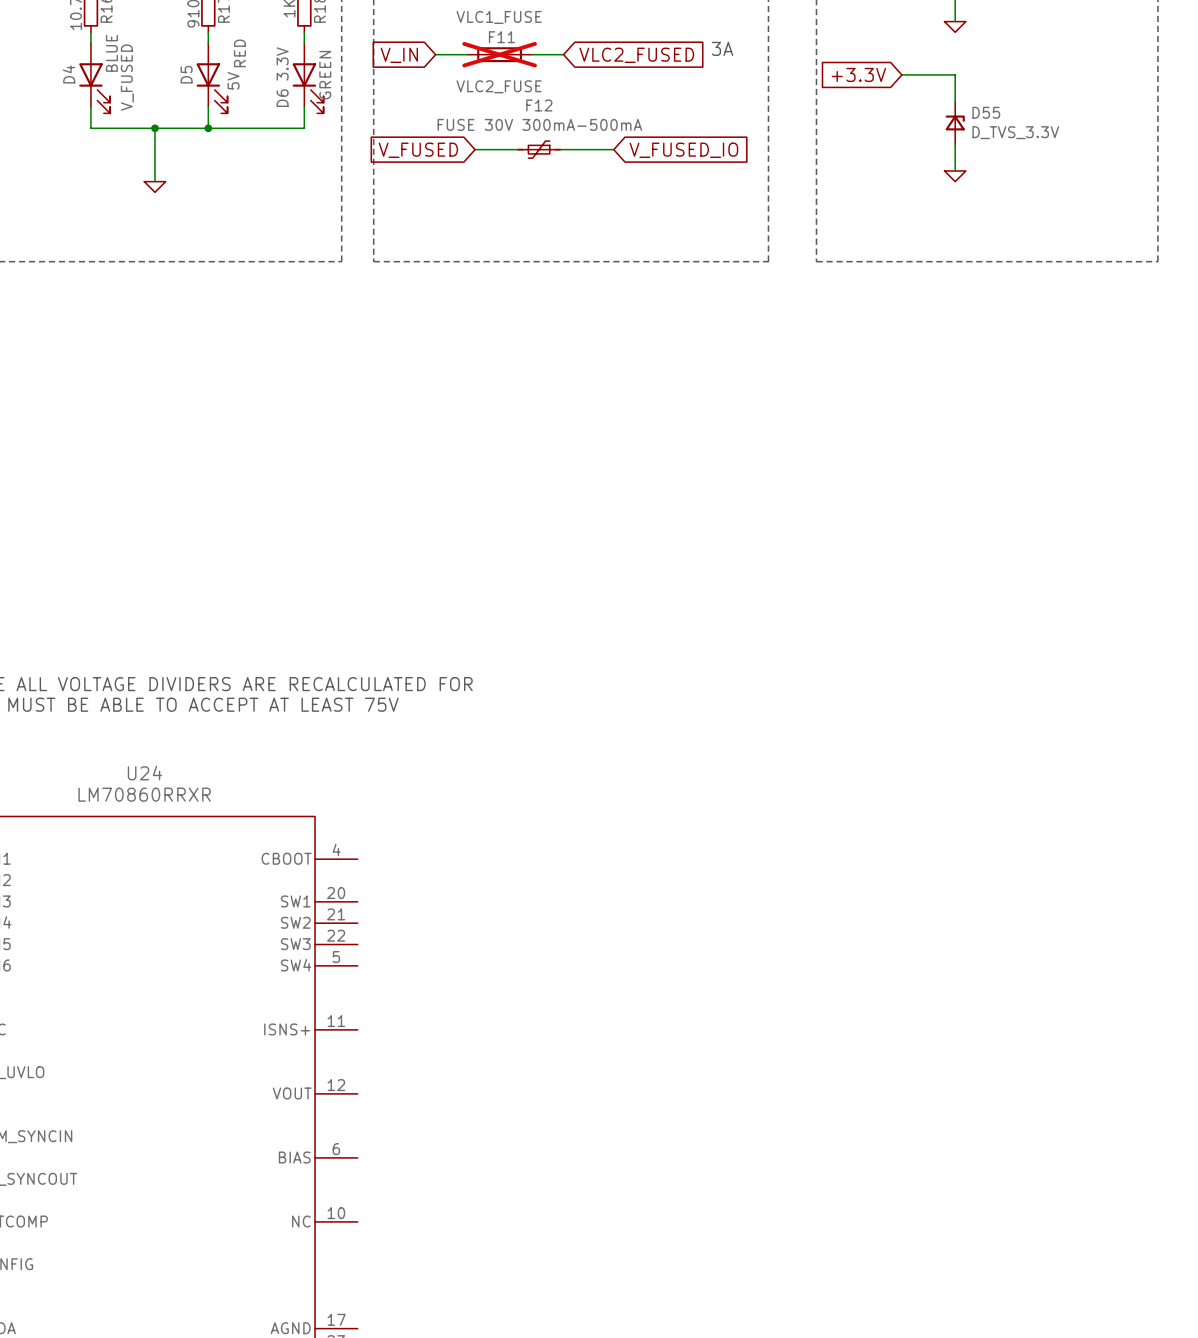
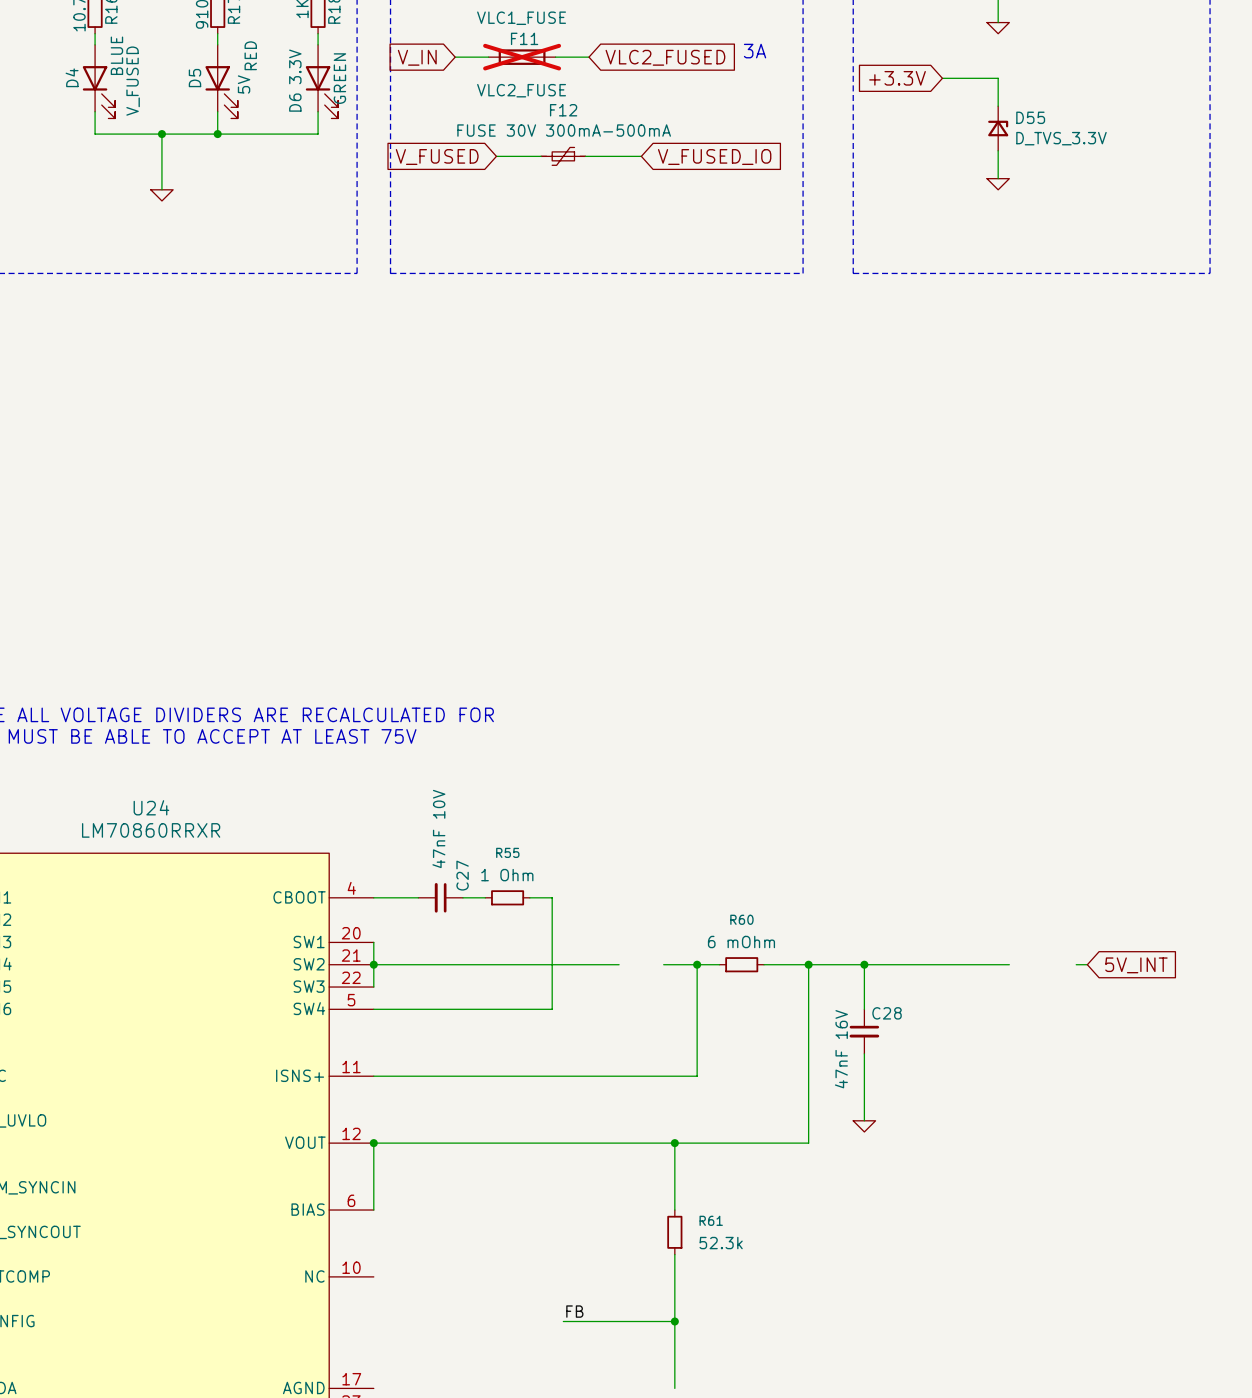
wire: none -> (373, 897) (418, 897)
C27: none -> 47nF 10V (440, 897)
wire: none -> (462, 897) (485, 897)
R55: none -> 1 Ohm (507, 897)
wire: none -> (529, 897) (552, 897) (552, 1009) (373, 1009)
wire: none -> (373, 942) (373, 987)
wire: none -> (373, 964) (619, 964)
junction: none -> (373, 964)
wire: none -> (663, 964) (719, 964)
wire: none -> (697, 964) (697, 1076) (373, 1076)
junction: none -> (697, 964)
R60: none -> 6 mOhm (741, 964)
wire: none -> (764, 964) (1009, 964)
wire: none -> (808, 964) (808, 1143) (373, 1143) (373, 1210)
junction: none -> (808, 964)
wire: none -> (864, 964) (864, 1009)
junction: none -> (864, 964)
wire: none -> (1076, 964) (1087, 964)
global label: none -> 5V_INT (1136, 965)
C28: none -> 47nF 16V (864, 1031)
wire: none -> (864, 1053) (864, 1120)
power symbol: none -> (864, 1126)
junction: none -> (373, 1143)
wire: none -> (674, 1143) (674, 1210)
junction: none -> (674, 1143)
R61: none -> 52.3k (674, 1232)
wire: none -> (674, 1254) (674, 1388)
label: none -> FB (574, 1311)
wire: none -> (563, 1321) (674, 1321)
junction: none -> (674, 1321)

